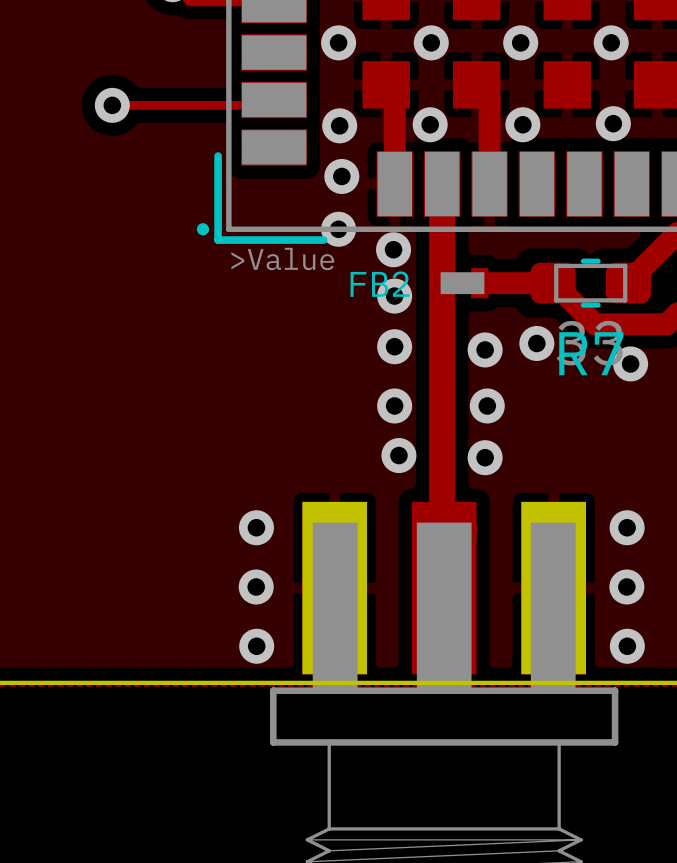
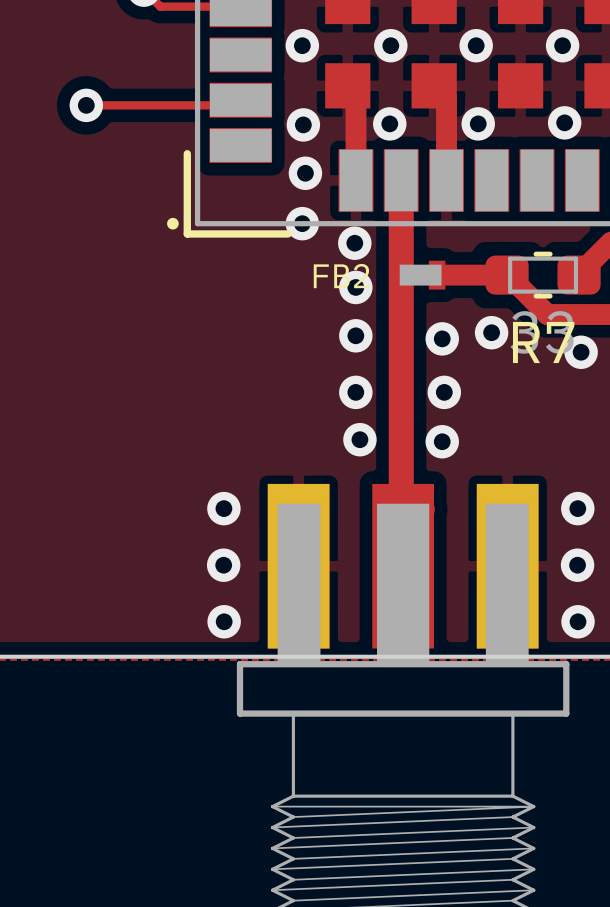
part text: >Value (282, 258) -> none

